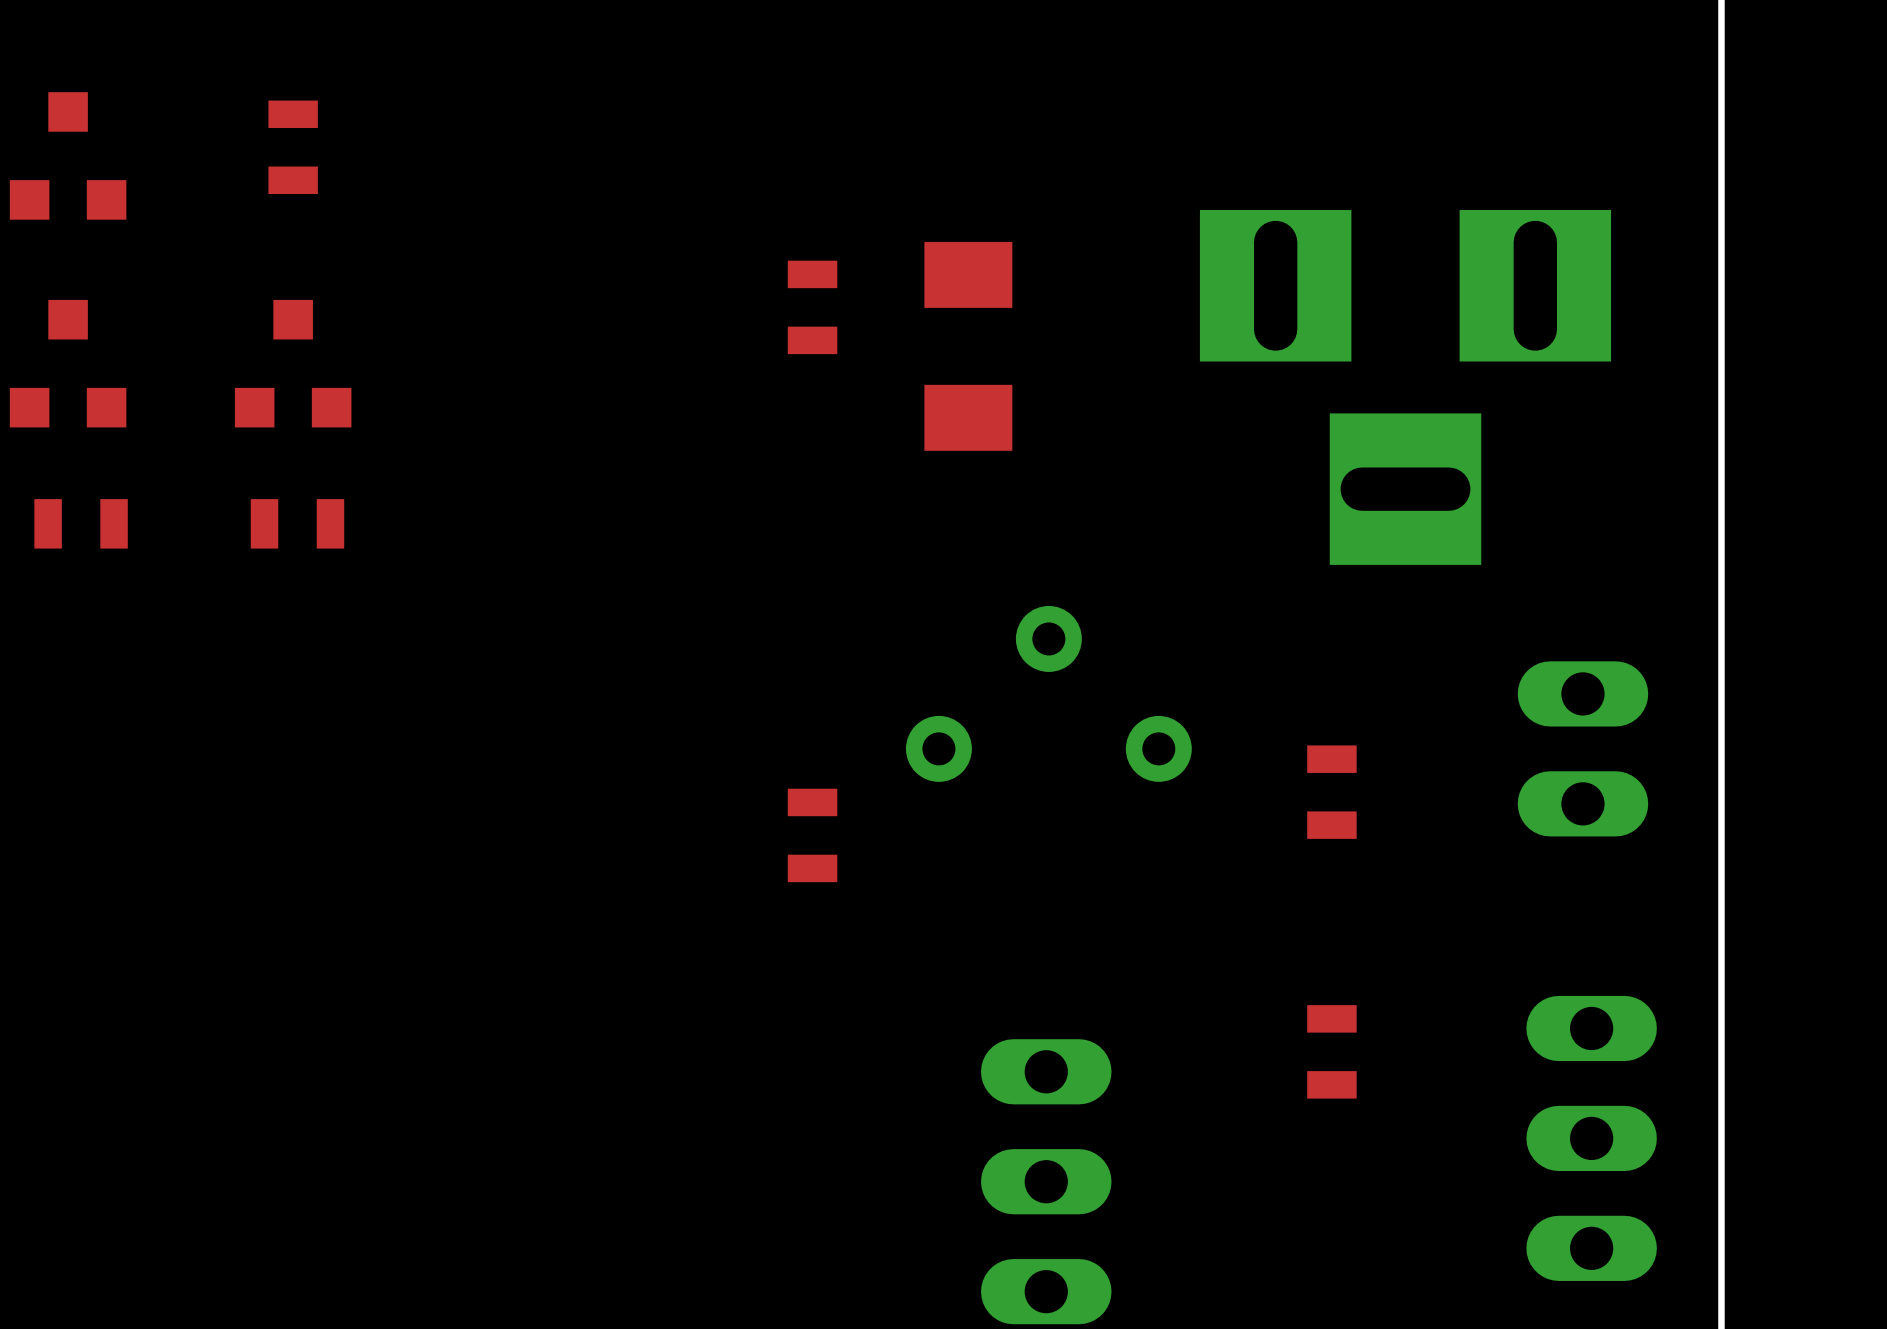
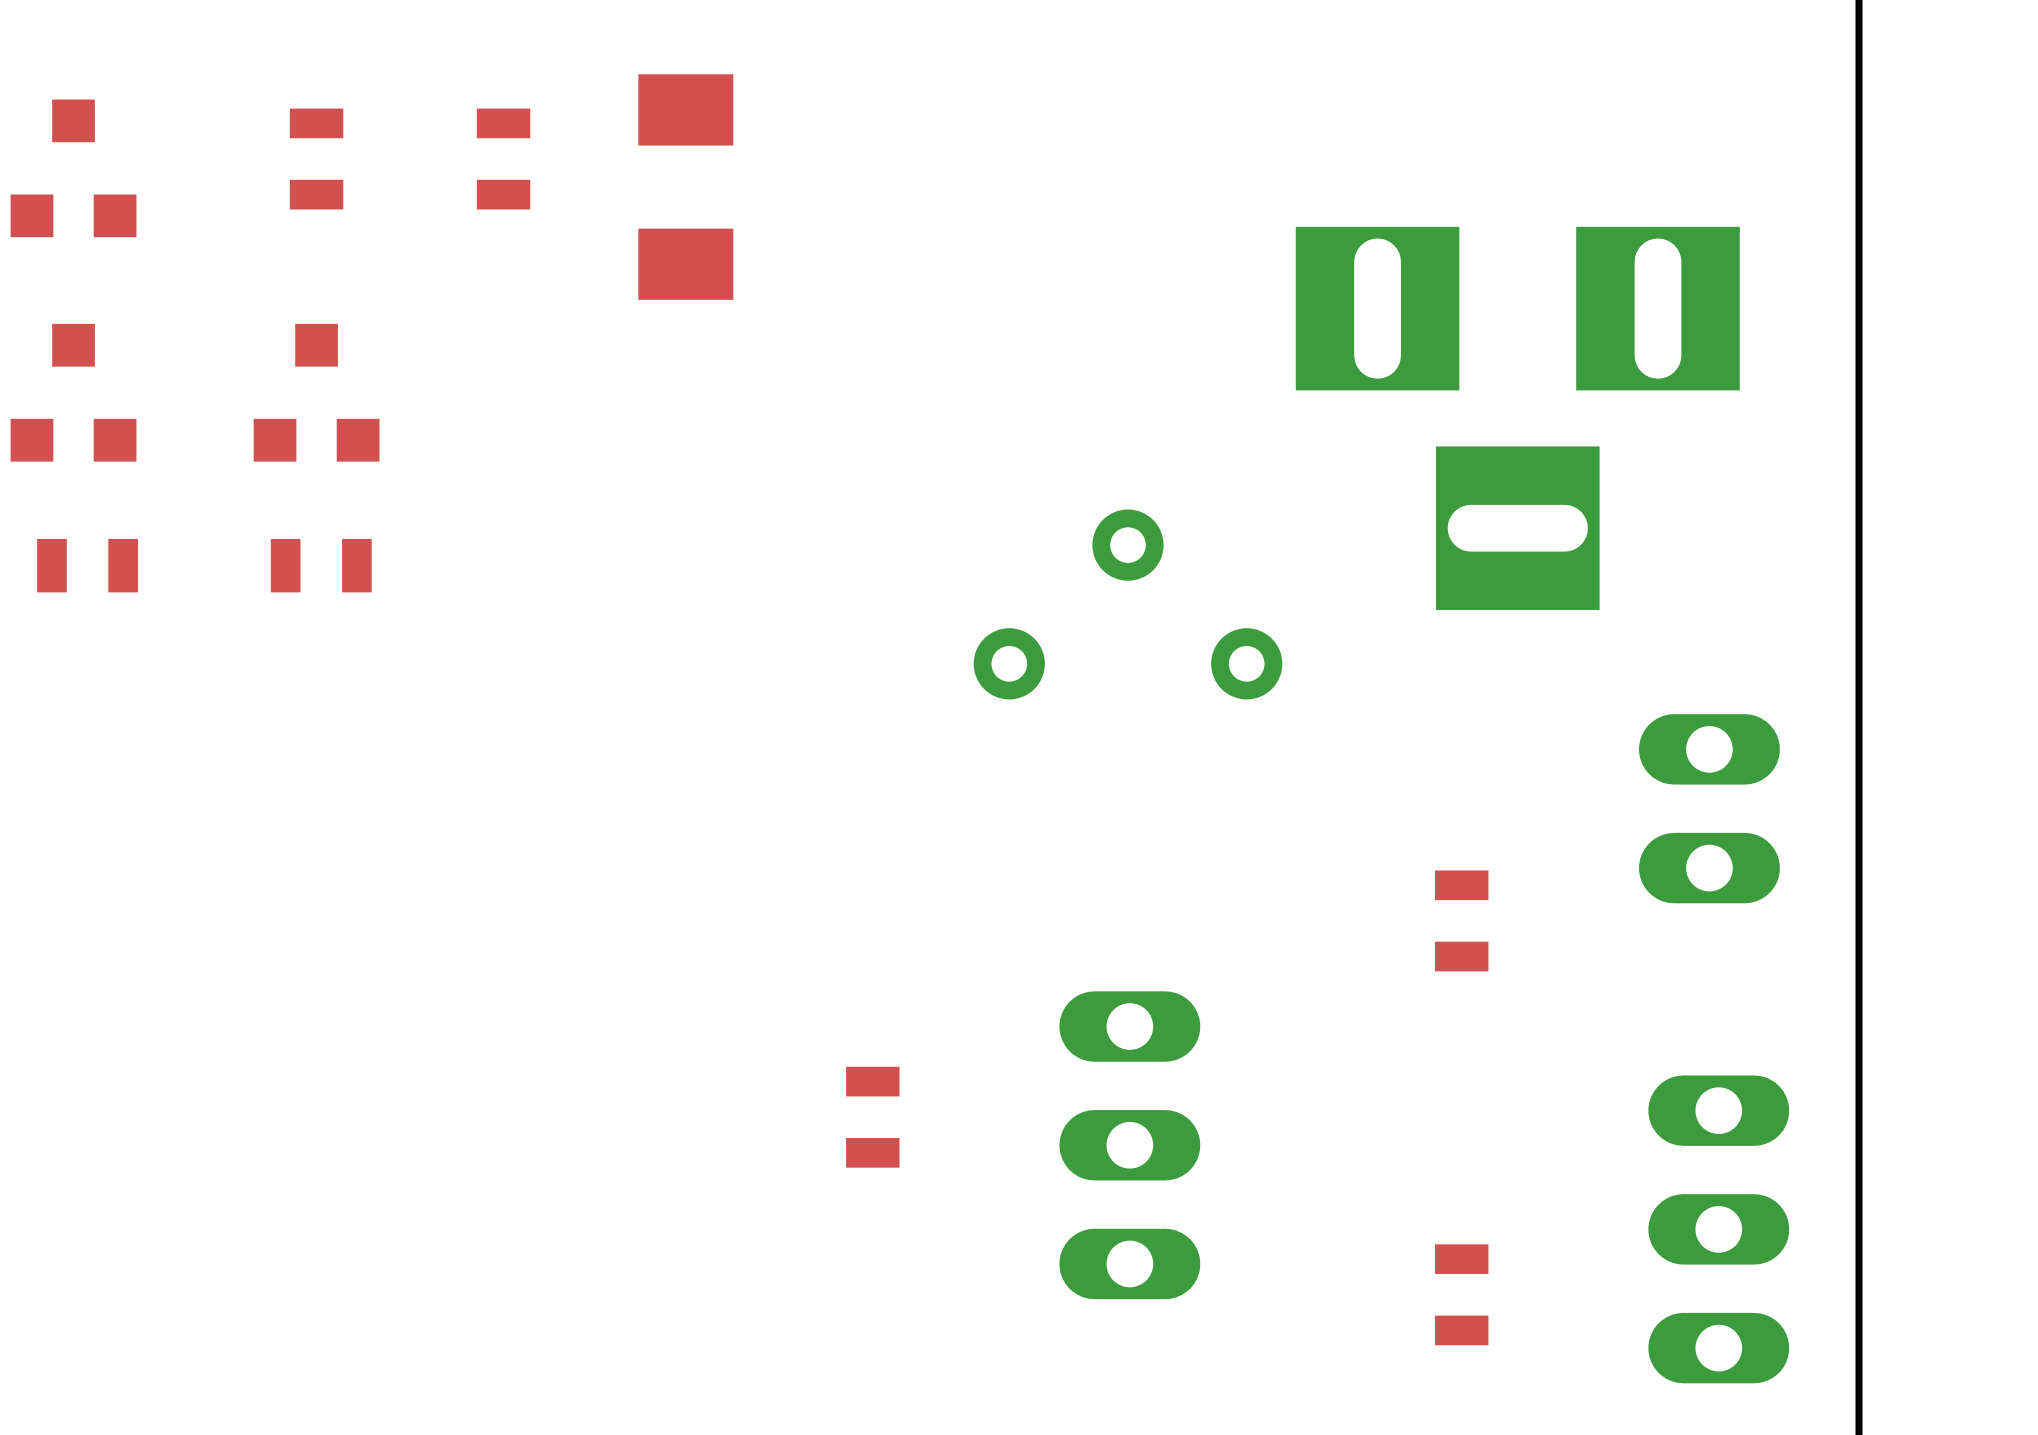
part: none -> (503, 159)
part: (812, 307) -> none
part position: (968, 346) -> (685, 187)
part position: (1048, 693) -> (1127, 604)
part position: (1331, 792) -> (1461, 920)
part position: (812, 835) -> (872, 1117)
part: (1331, 1051) -> none
part position: (1046, 1181) -> (1129, 1145)
part: none -> (1461, 1294)

